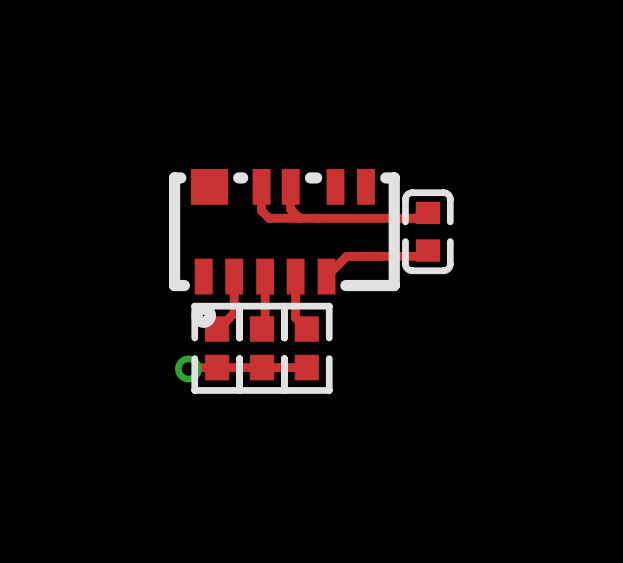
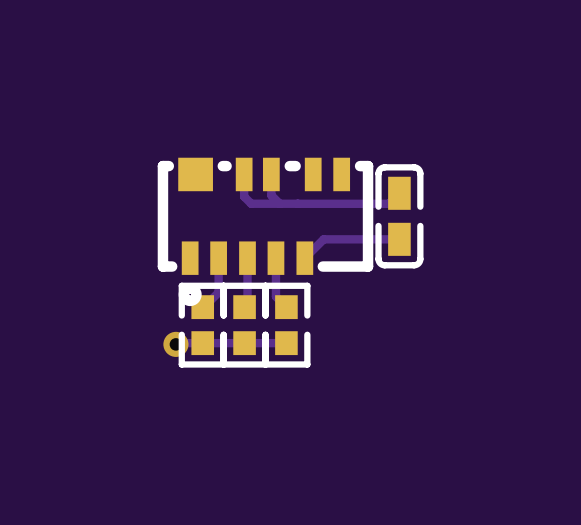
part footprint: [402, 189, 454, 275] -> [375, 164, 424, 269]

